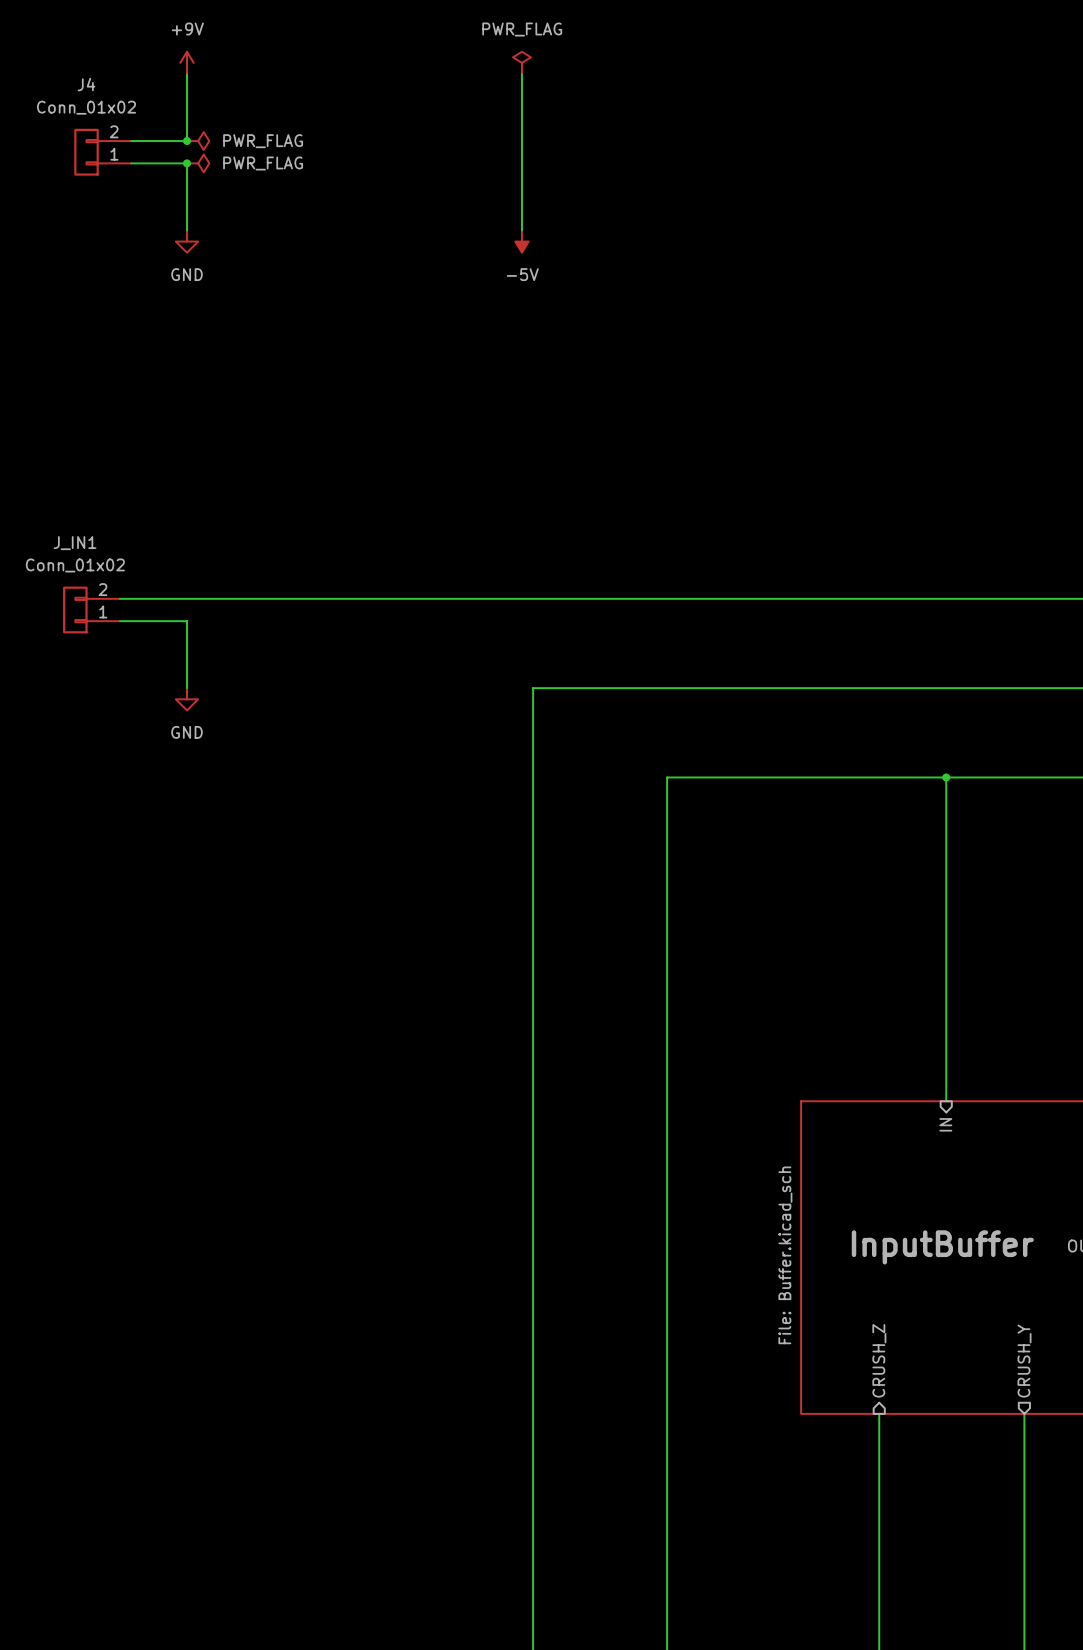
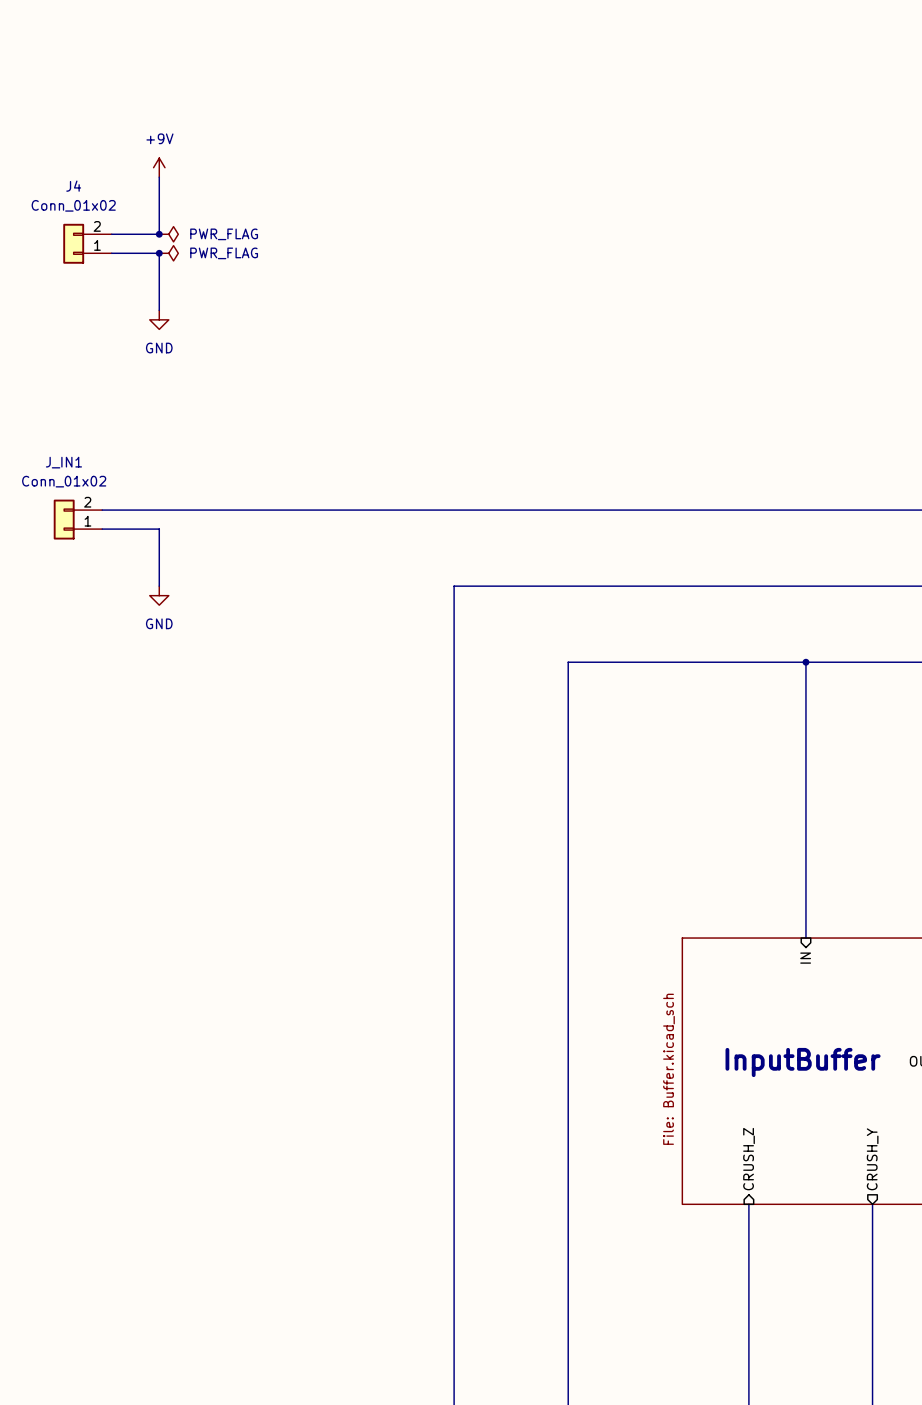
power symbol position: +9V (187, 62) -> +9V (159, 167)
power symbol: PWR_FLAG (521, 62) -> none
wire: (187, 74) (187, 141) (131, 141) -> none
wire: (521, 74) (521, 230) -> none
junction: (187, 141) -> none
power symbol: PWR_FLAG (198, 141) -> none
J4 position: (102, 152) -> (87, 243)
wire: (131, 163) (187, 163) (187, 208) -> none
junction: (187, 163) -> none
power symbol: PWR_FLAG (198, 163) -> none
wire: none -> (159, 196) (159, 234) (111, 234)
power symbol position: GND (187, 241) -> GND (159, 319)
power symbol: -5V (521, 241) -> none
junction: none -> (159, 234)
power symbol: none -> PWR_FLAG (168, 234)
wire: none -> (111, 253) (159, 253) (159, 310)
junction: none -> (159, 253)
power symbol: none -> PWR_FLAG (168, 253)

